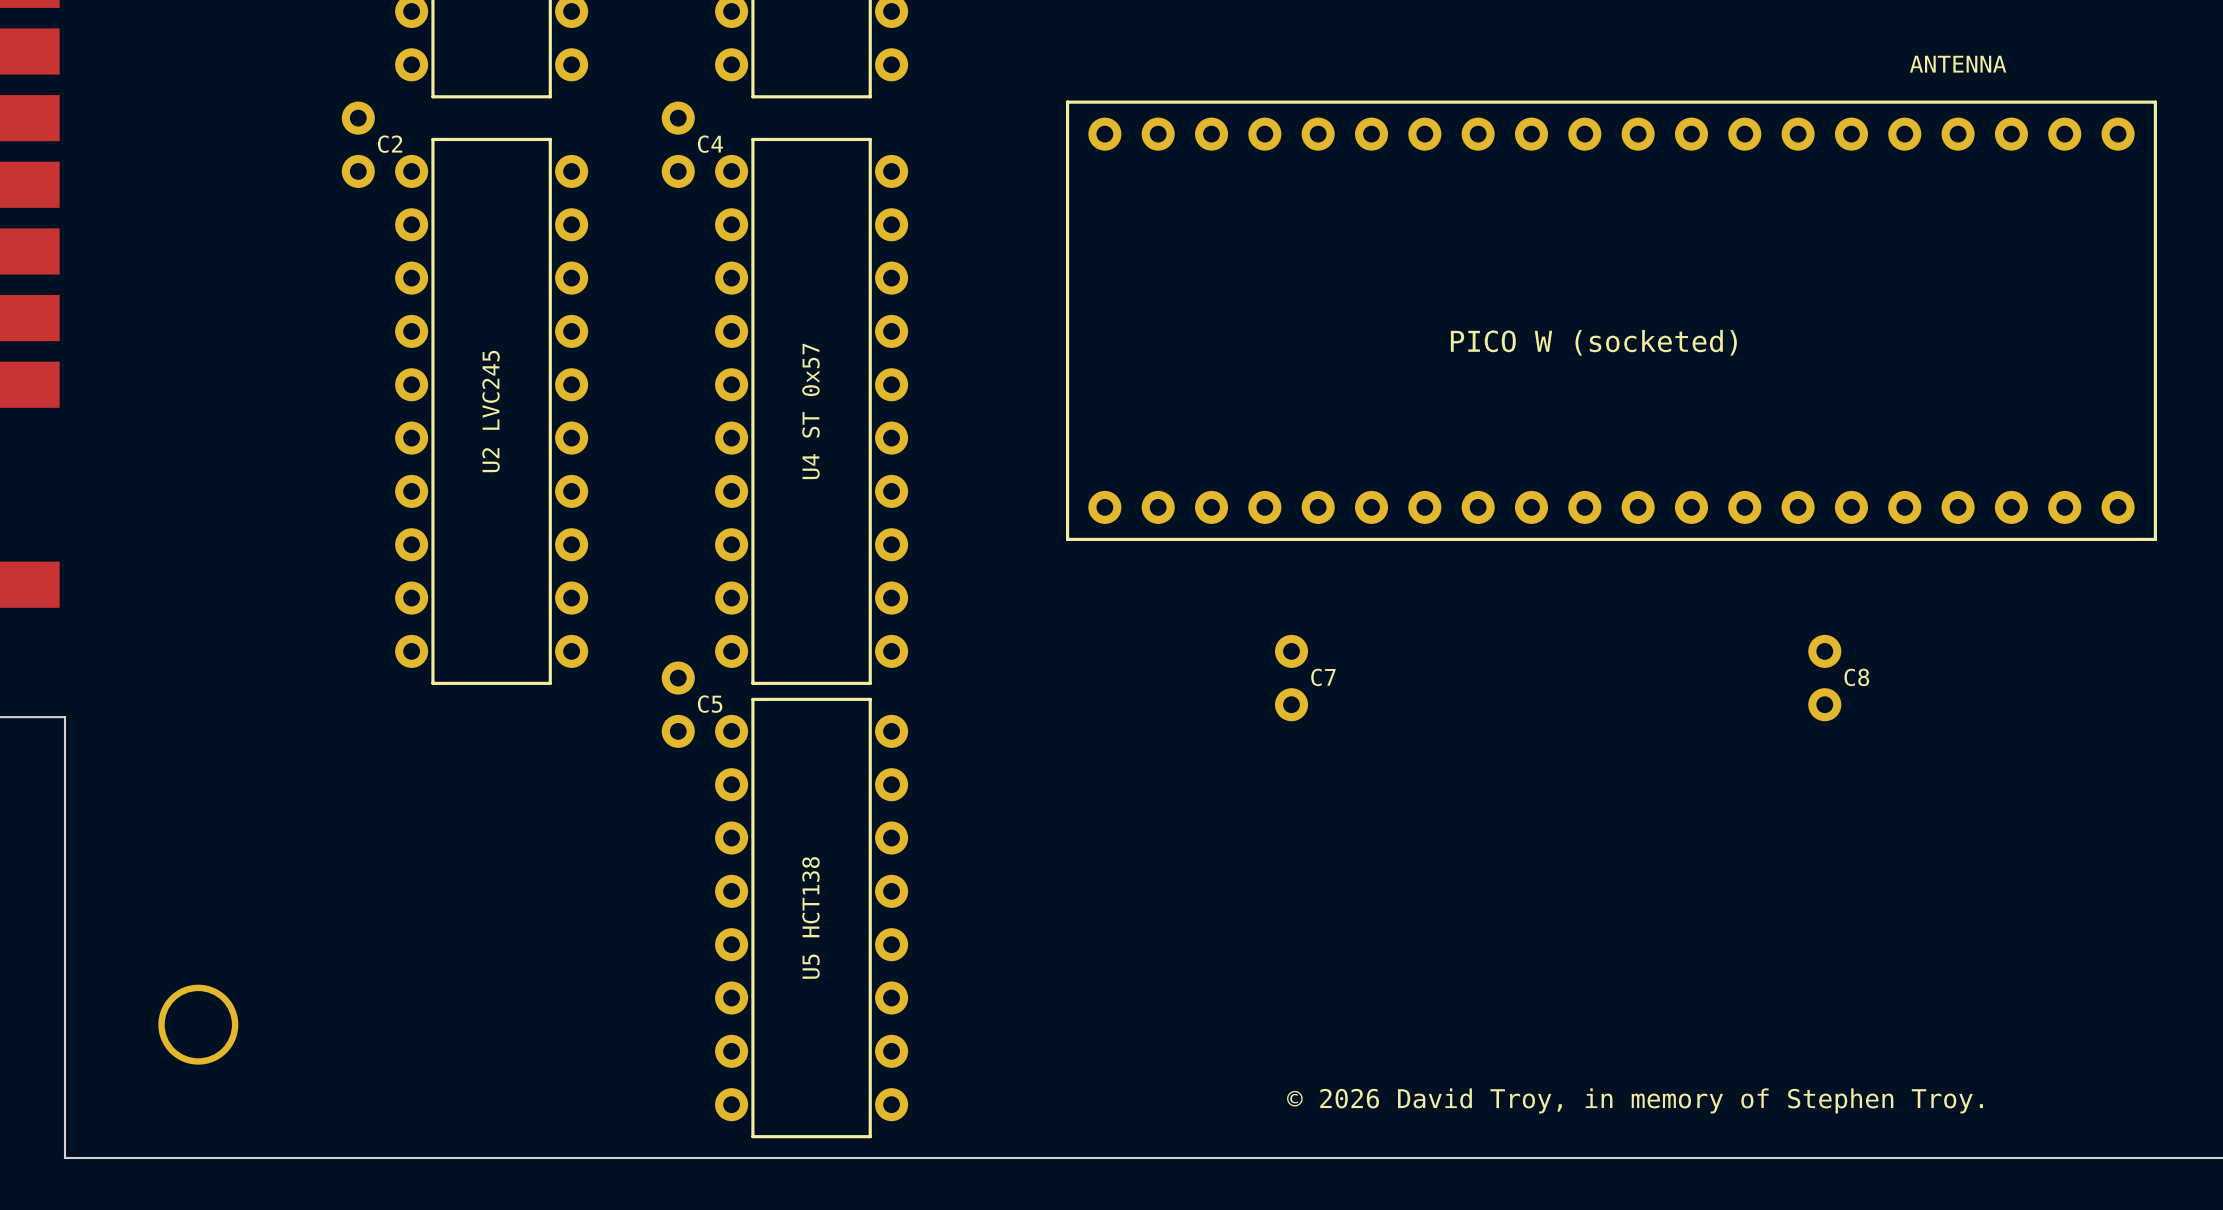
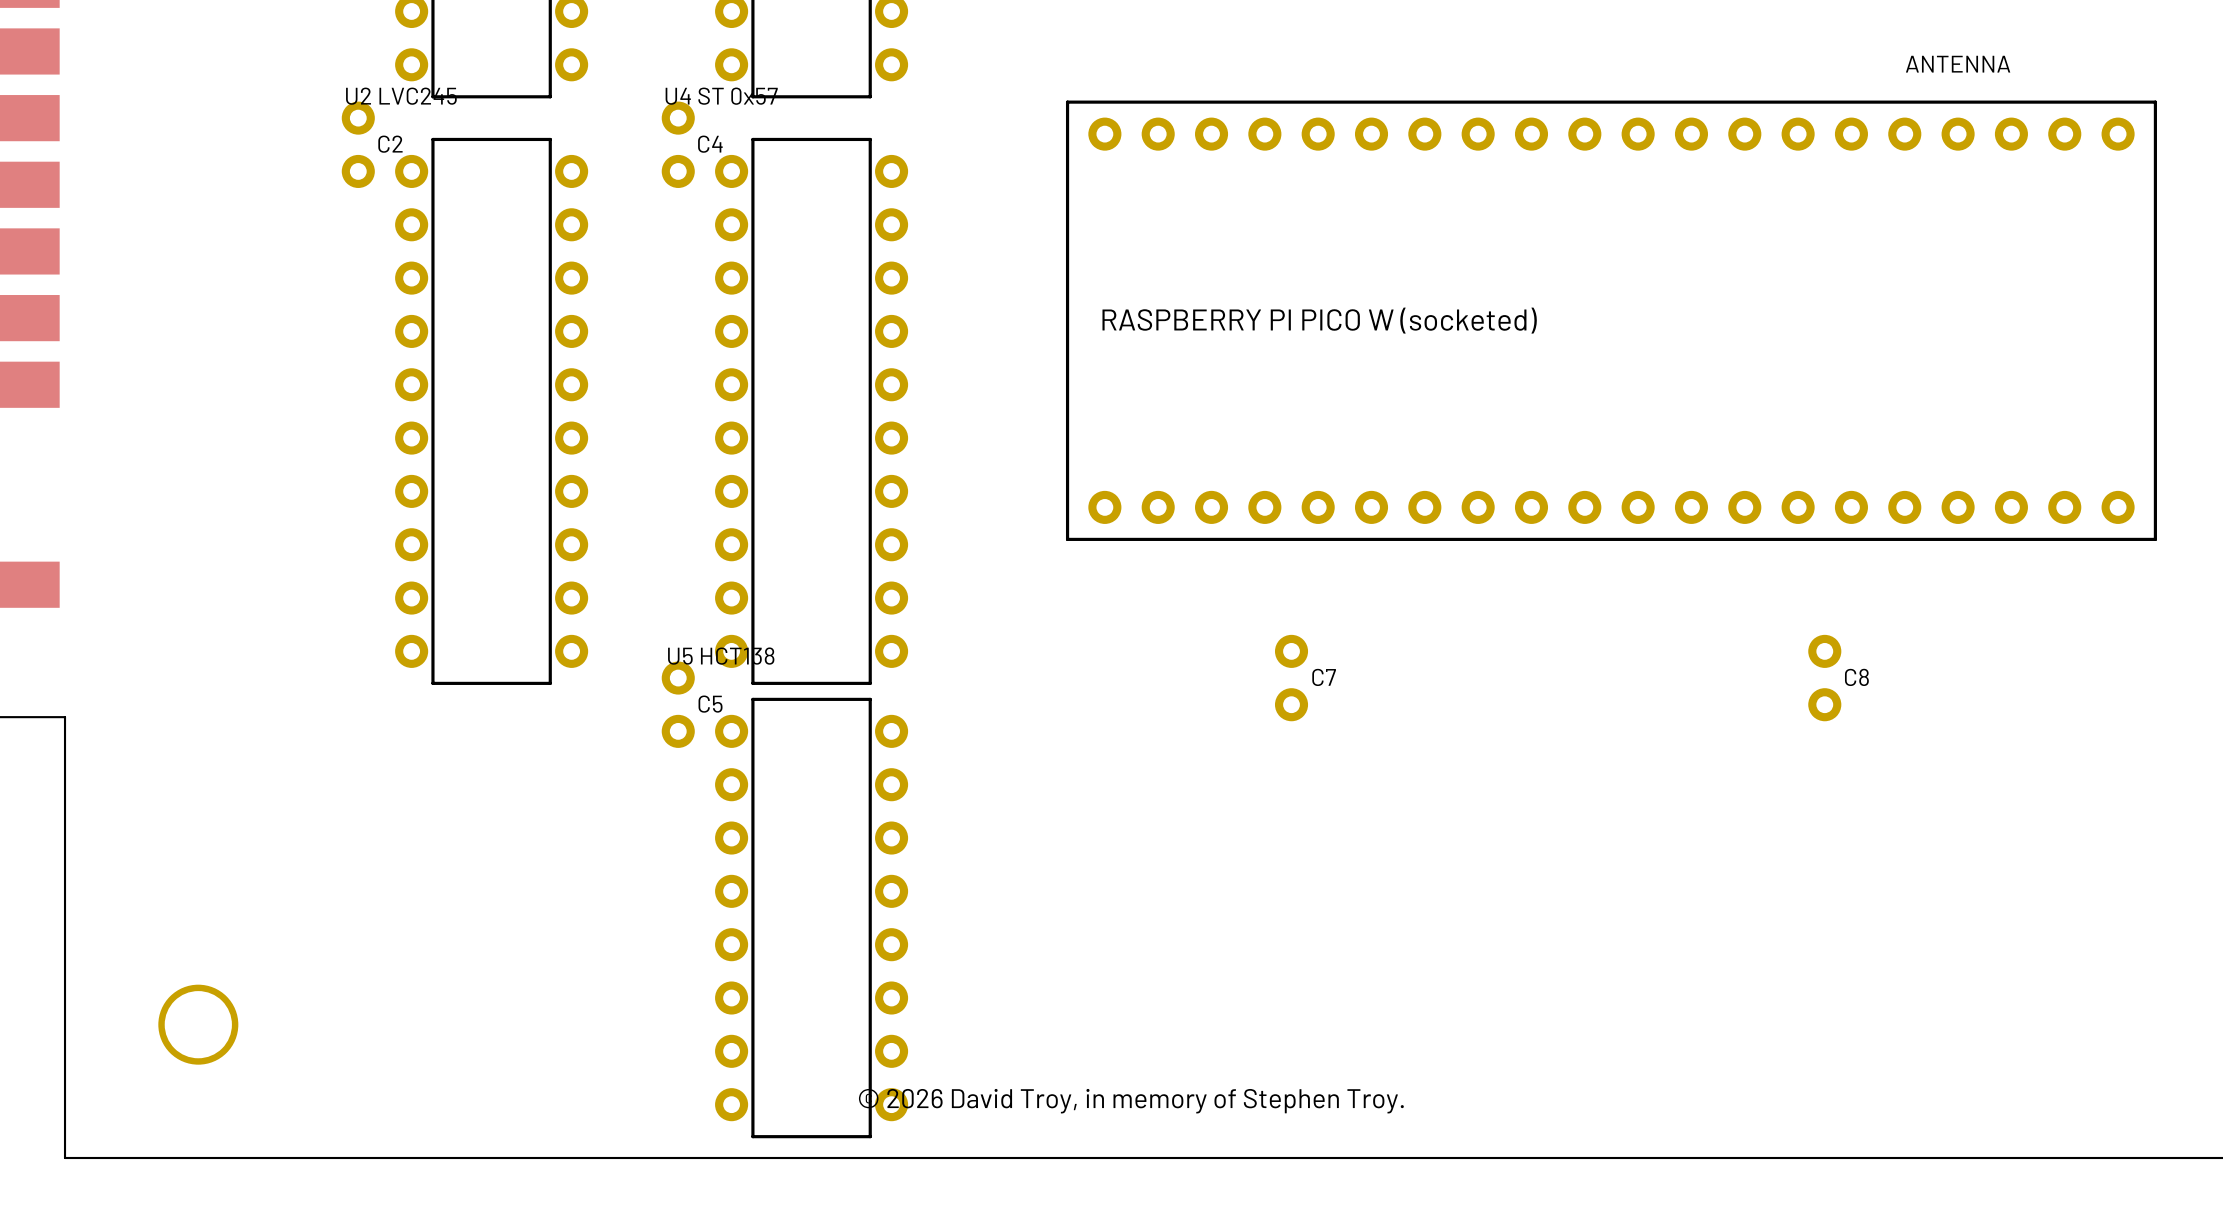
text: PICO W (socketed) (1593, 342) -> RASPBERRY PI PICO W (socketed) (1319, 320)
text rotation: 0° (491, 411) -> 90° clockwise (401, 96)
text position: U2 LVC245 (491, 411) -> U2 LVC245 (401, 96)
text rotation: 0° (810, 411) -> 90° clockwise (721, 96)
text position: U4 ST 0x57 (810, 411) -> U4 ST 0x57 (721, 96)
text rotation: 0° (810, 917) -> 90° clockwise (721, 656)
text position: U5 HCT138 (810, 917) -> U5 HCT138 (721, 656)
text position: © 2026 David Troy, in memory of Stephen Troy. (1635, 1100) -> © 2026 David Troy, in memory of Stephen Troy. (1131, 1101)

